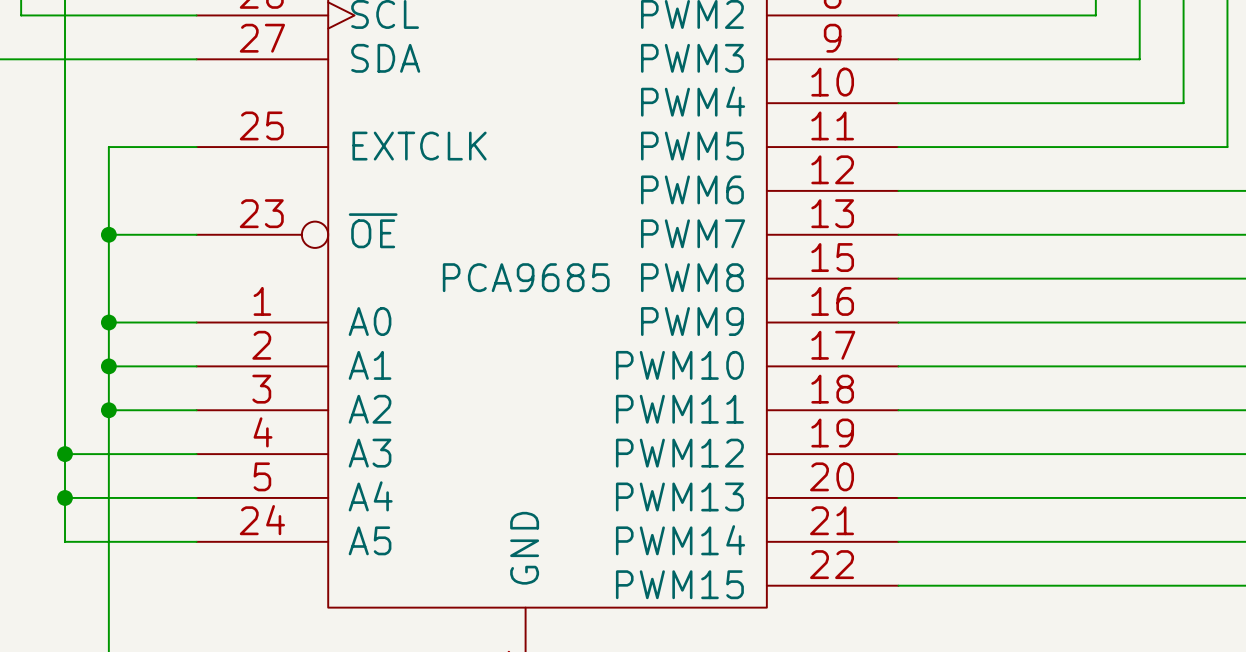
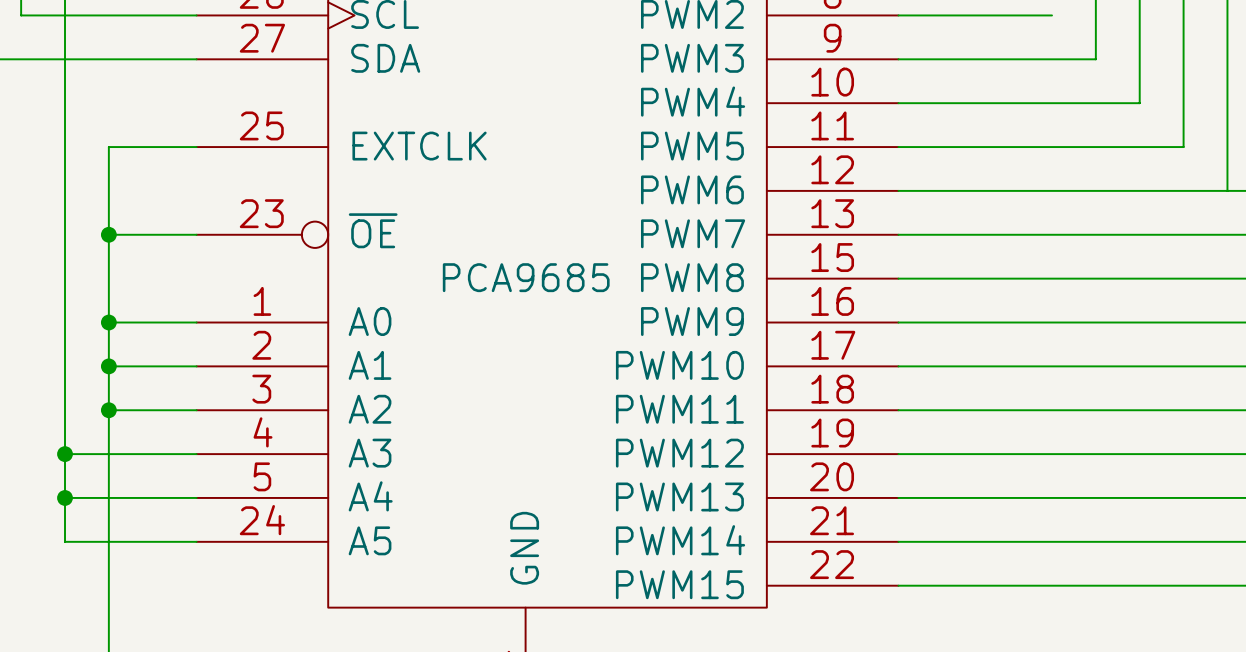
wire: (1051, 15) (1095, 15) -> none
wire: (1095, 59) (1139, 59) -> (1095, 59) (1095, 15)
wire: (1139, 103) (1183, 103) -> (1139, 103) (1139, 59)
wire: none -> (1183, 103) (1183, 147)
wire: (1183, 147) (1227, 147) -> (1227, 190) (1227, 147)

